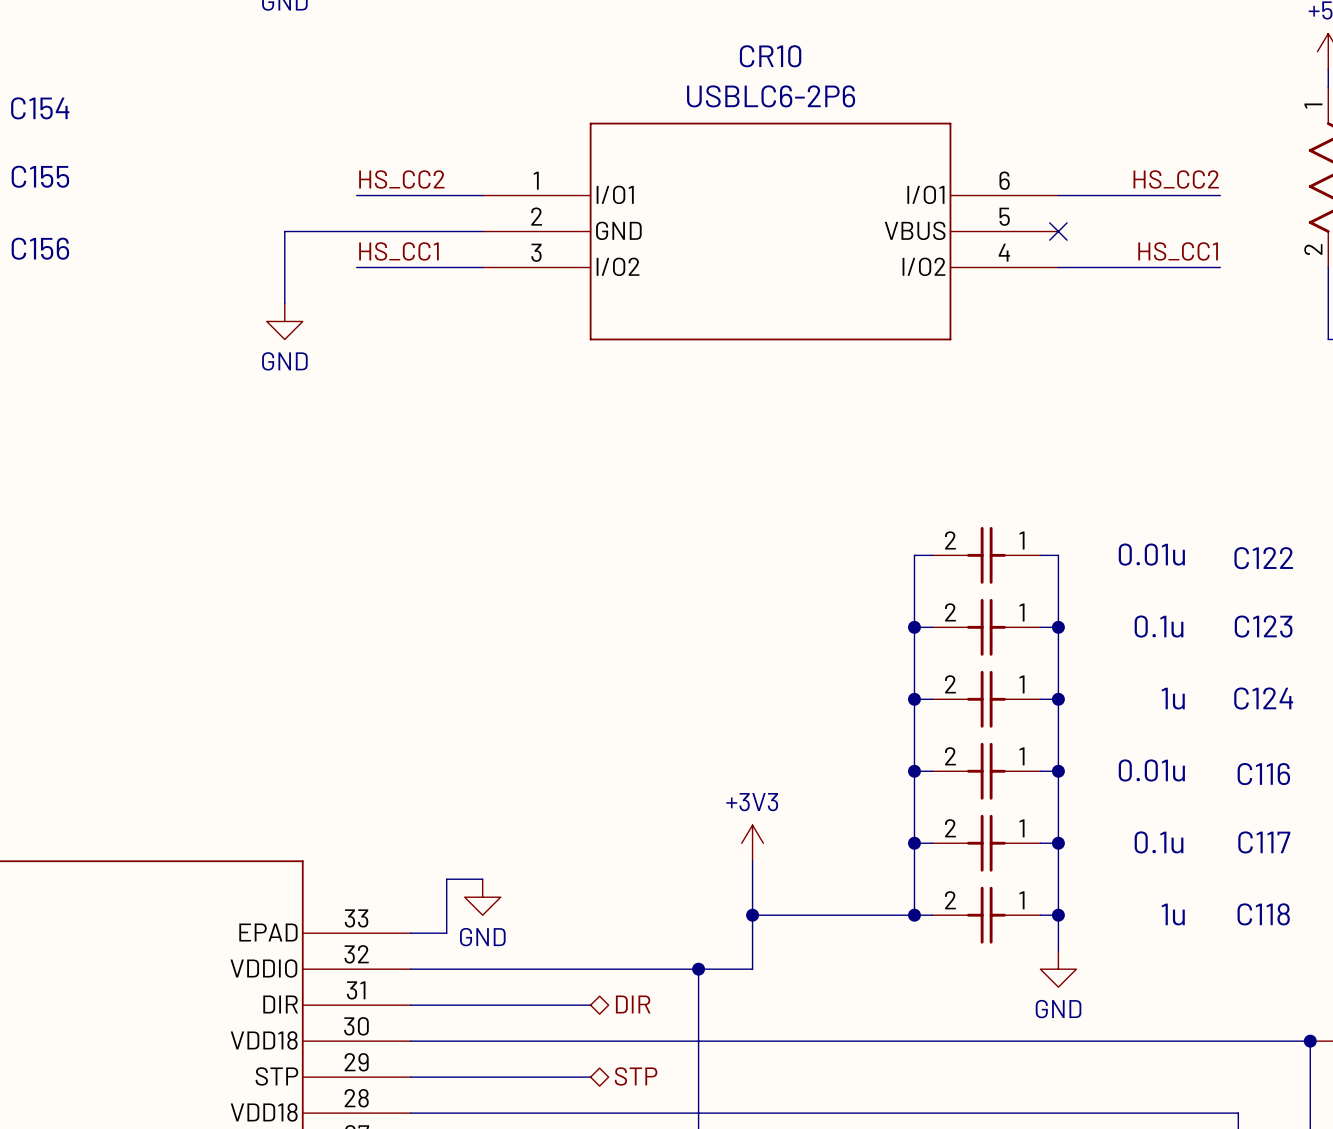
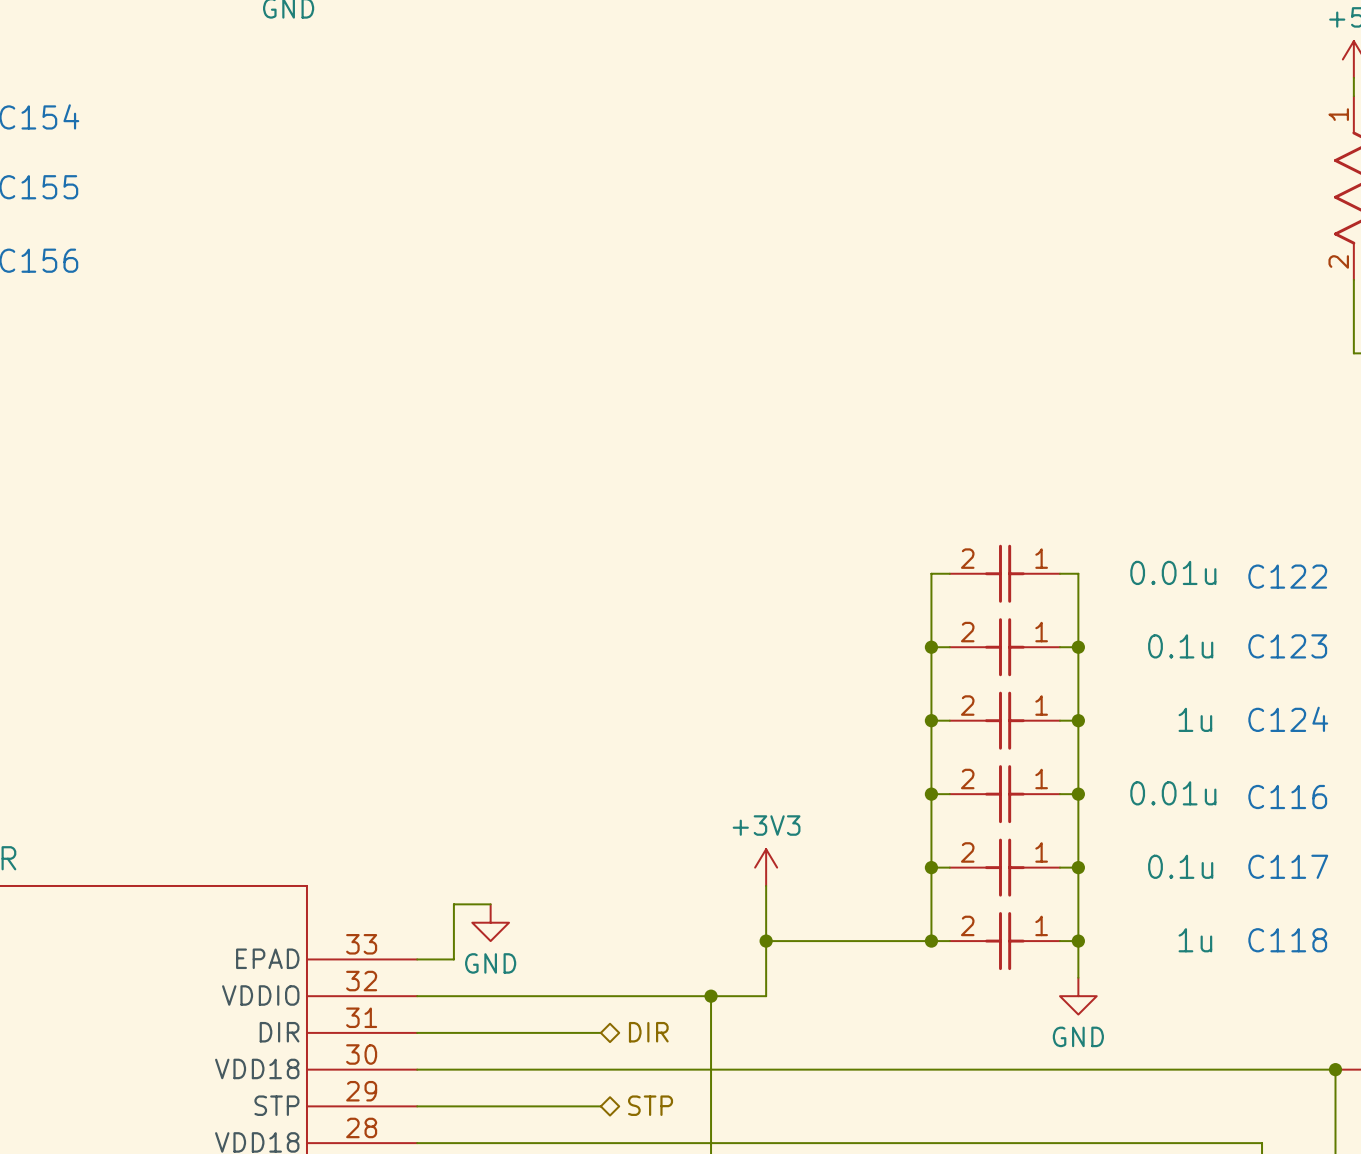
label: HS_CC2 (401, 179) -> none
label: HS_CC2 (1176, 179) -> none
wire: (356, 195) (482, 195) -> none
wire: (1058, 195) (1220, 195) -> none
wire: (482, 231) (284, 231) (284, 303) -> none
CR10: USBLC6-2P6 (770, 231) -> none
no-connect mark: (1058, 231) -> none
label: HS_CC1 (398, 251) -> none
label: HS_CC1 (1178, 251) -> none
wire: (356, 267) (482, 267) -> none
wire: (1058, 267) (1220, 267) -> none
power symbol: GND (284, 321) -> none

